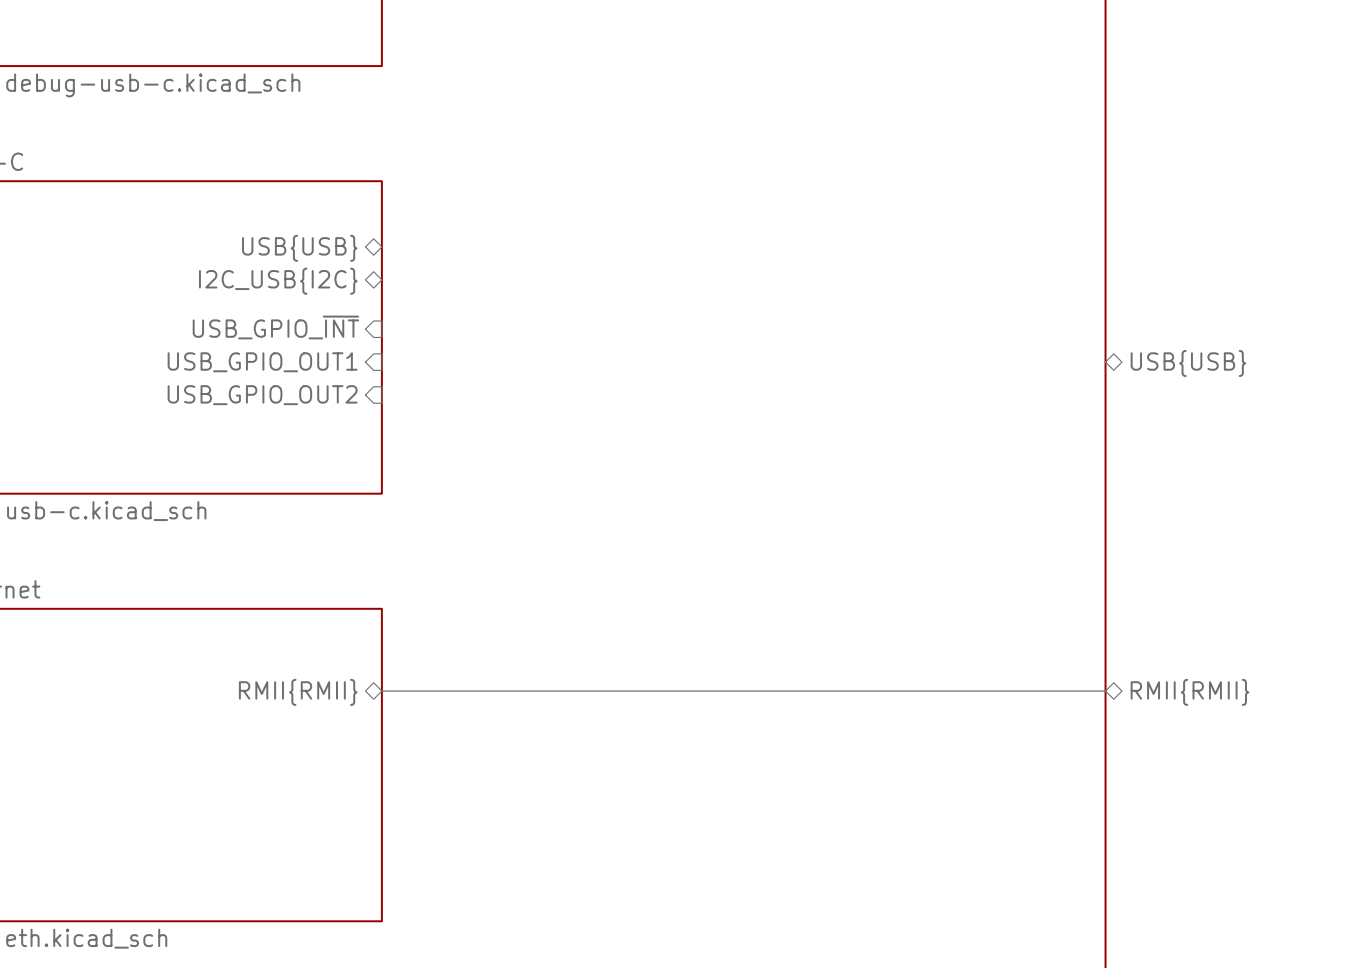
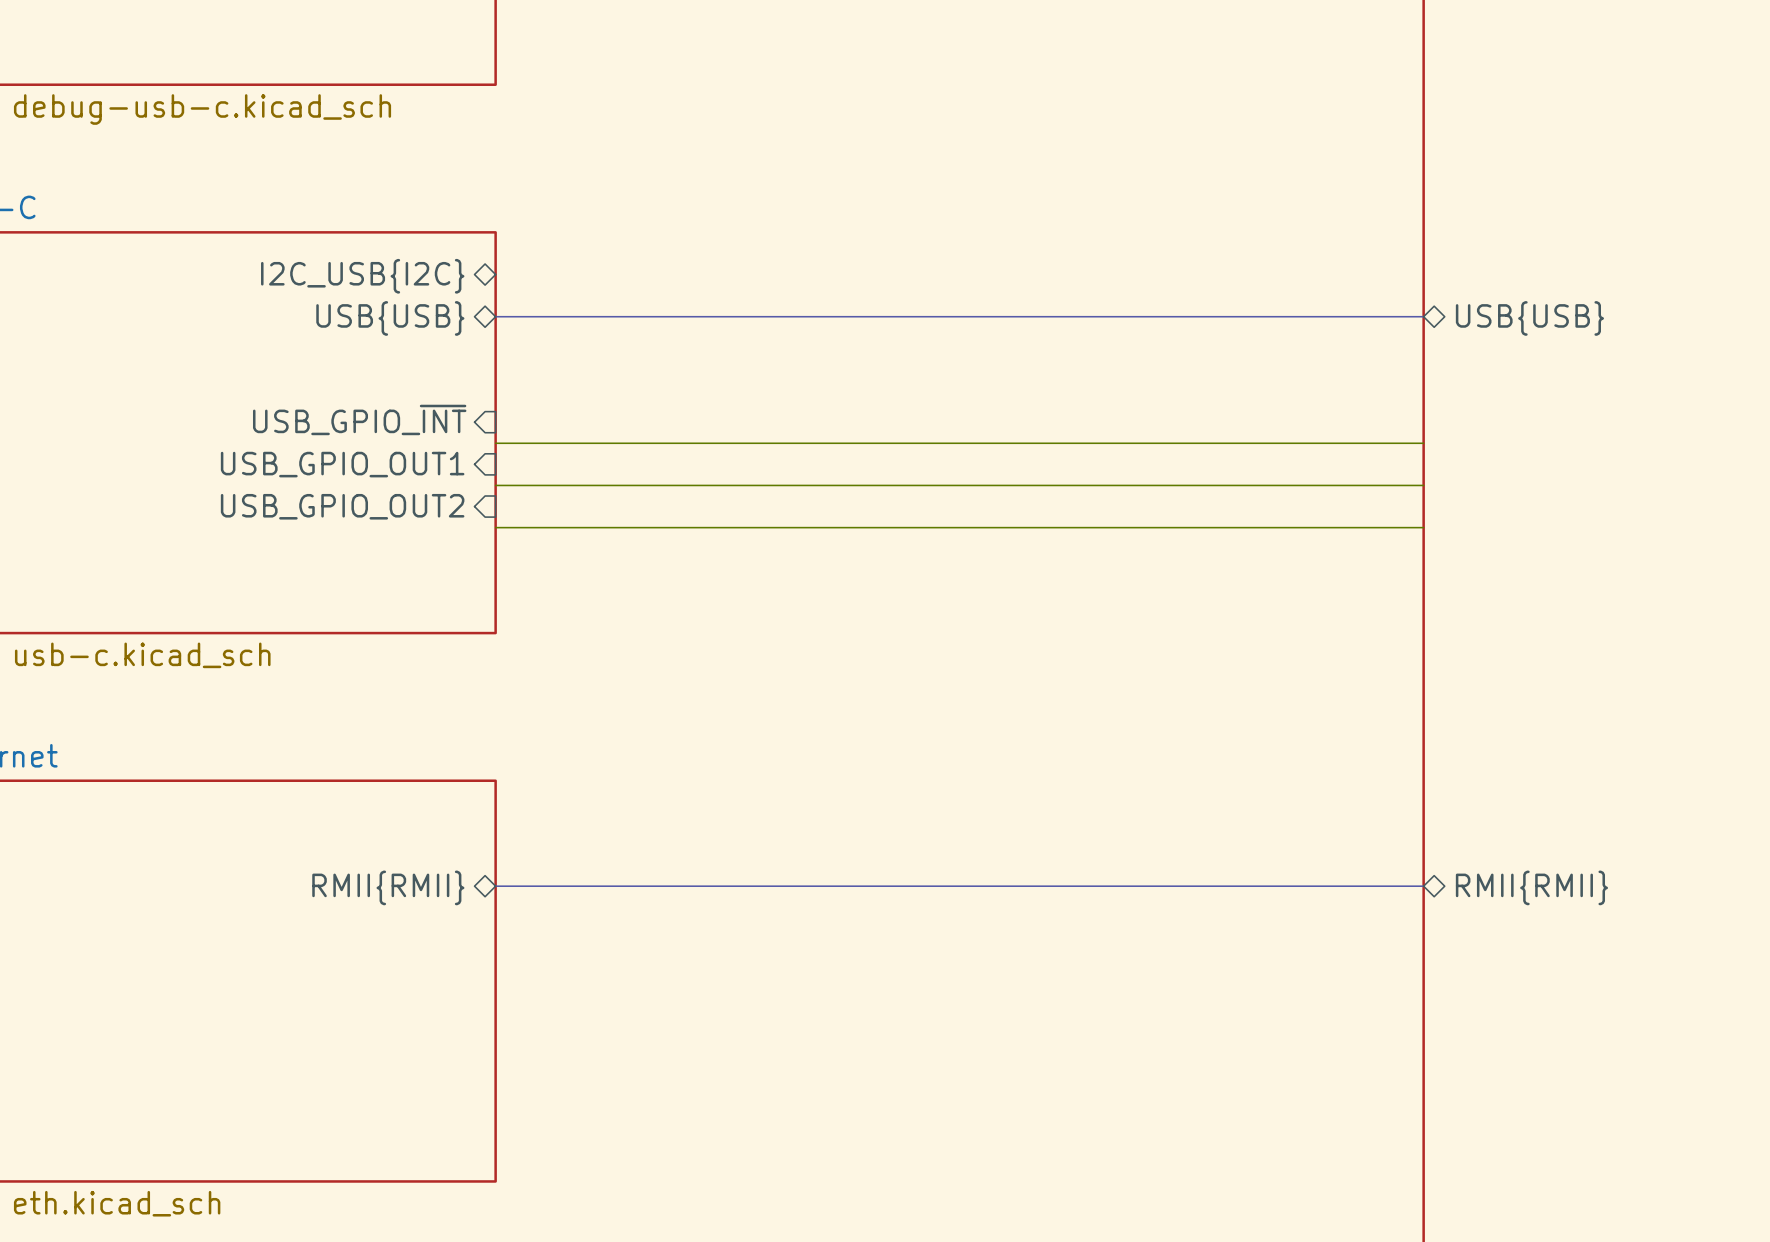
bus: none -> (495, 316) (1423, 316)
sheet pin position: I2C_USB{I2C} (278, 281) -> I2C_USB{I2C} (362, 276)
wire: none -> (495, 443) (1423, 443)
sheet pin position: USB{USB} (1188, 363) -> USB{USB} (1529, 318)
wire: none -> (495, 485) (1423, 485)
wire: none -> (495, 527) (1423, 527)

